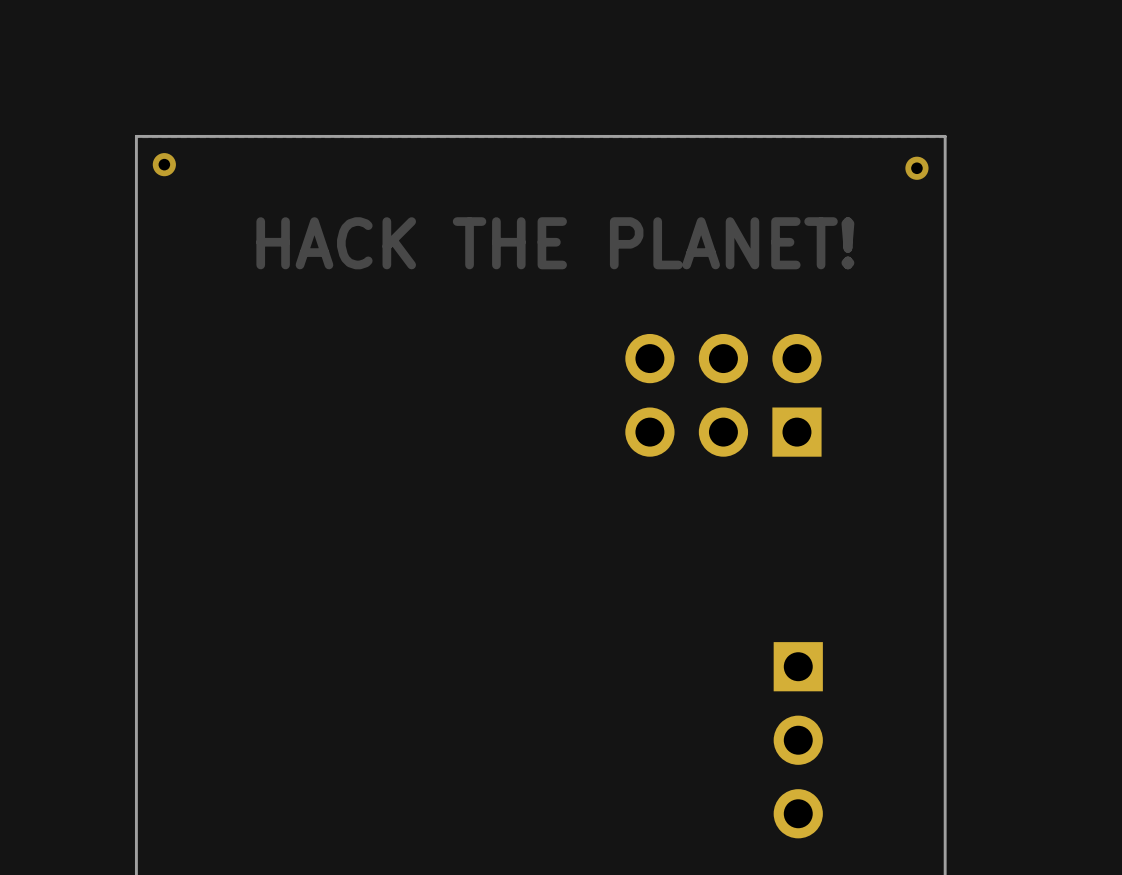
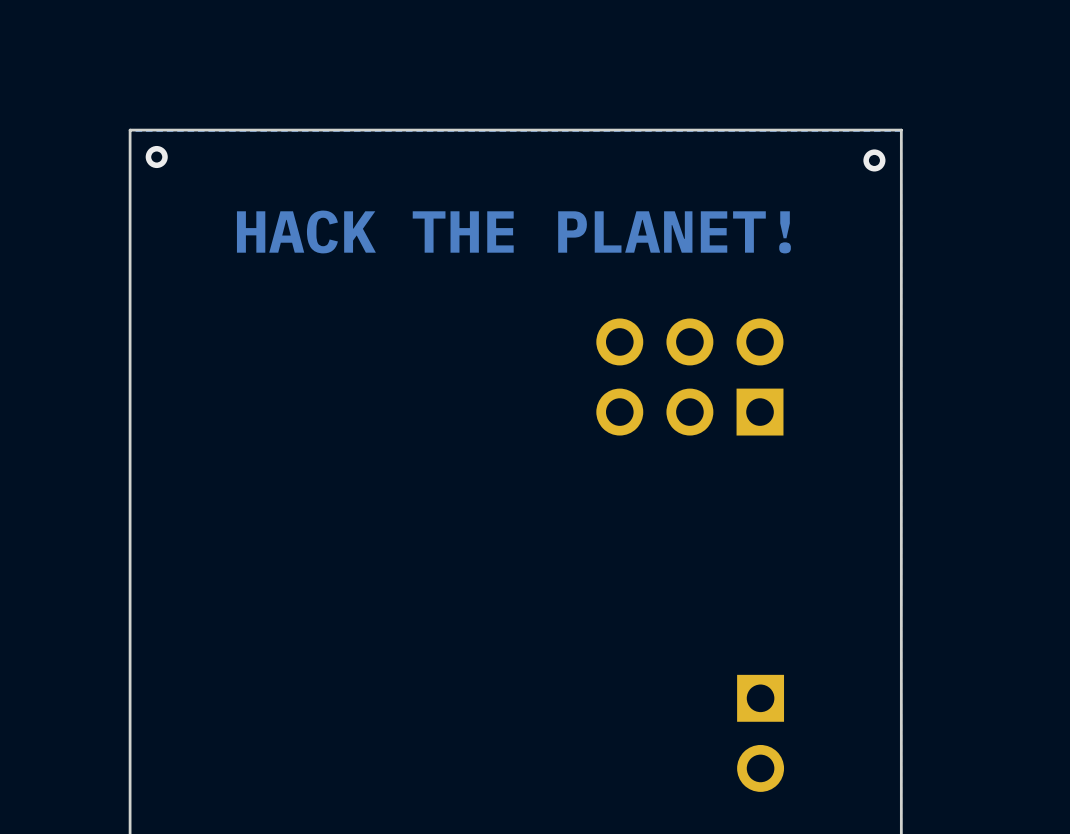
part footprint: [773, 642, 823, 839] -> [737, 674, 785, 792]

